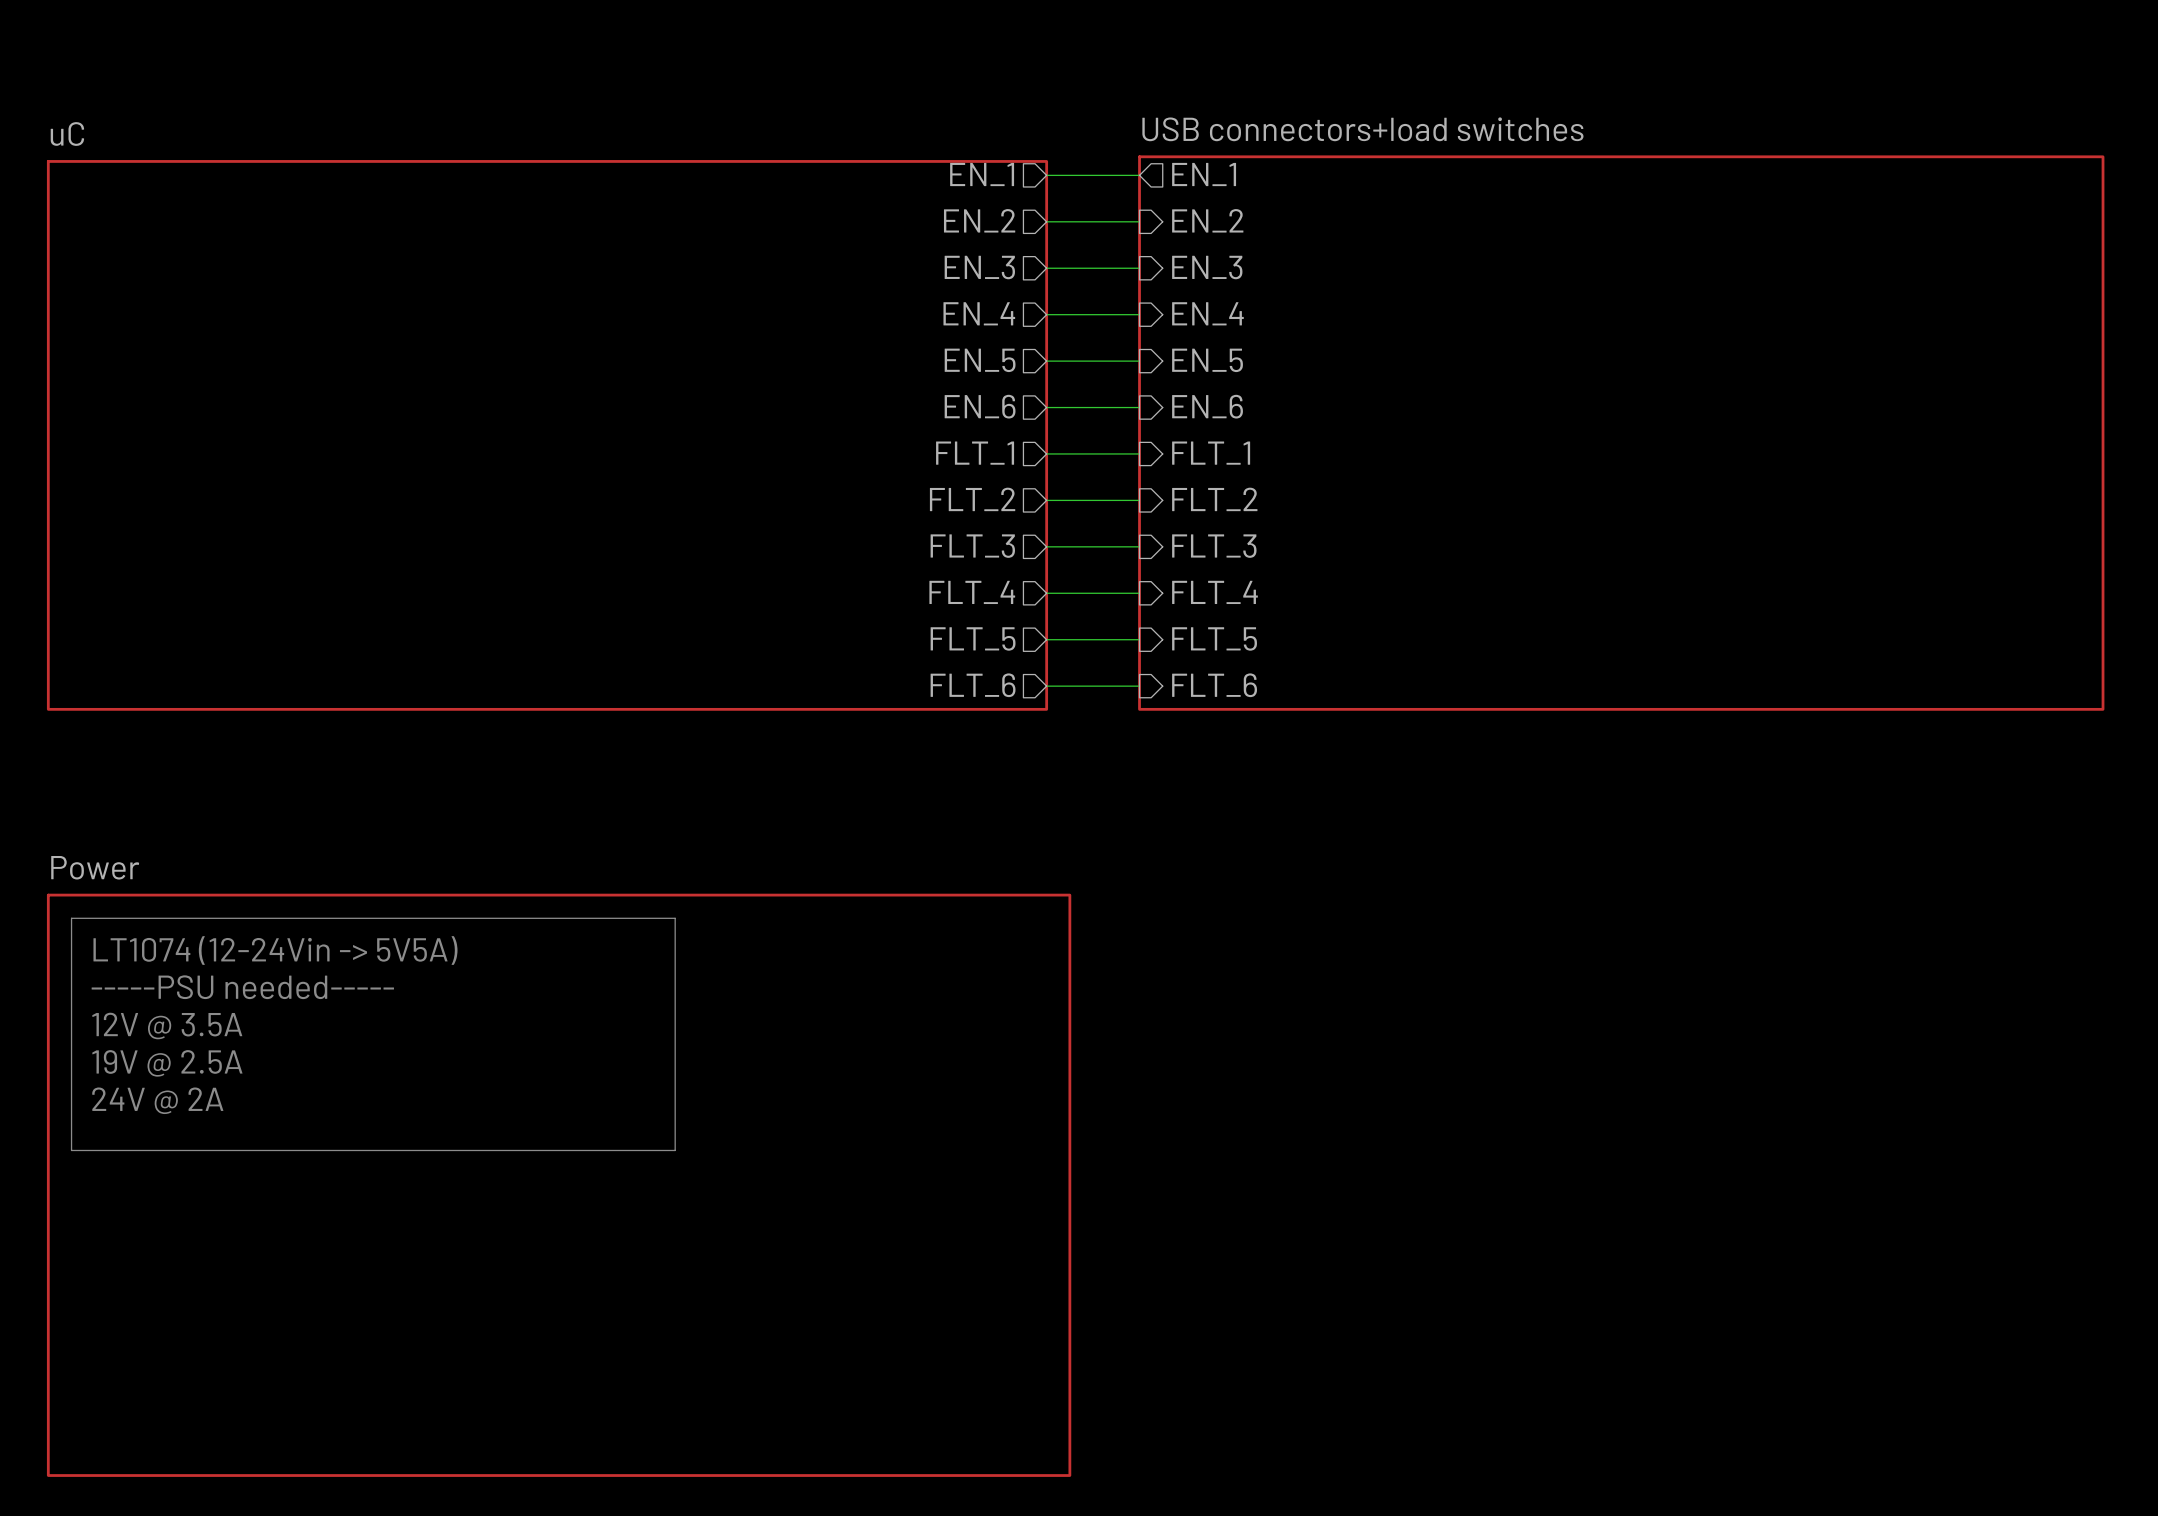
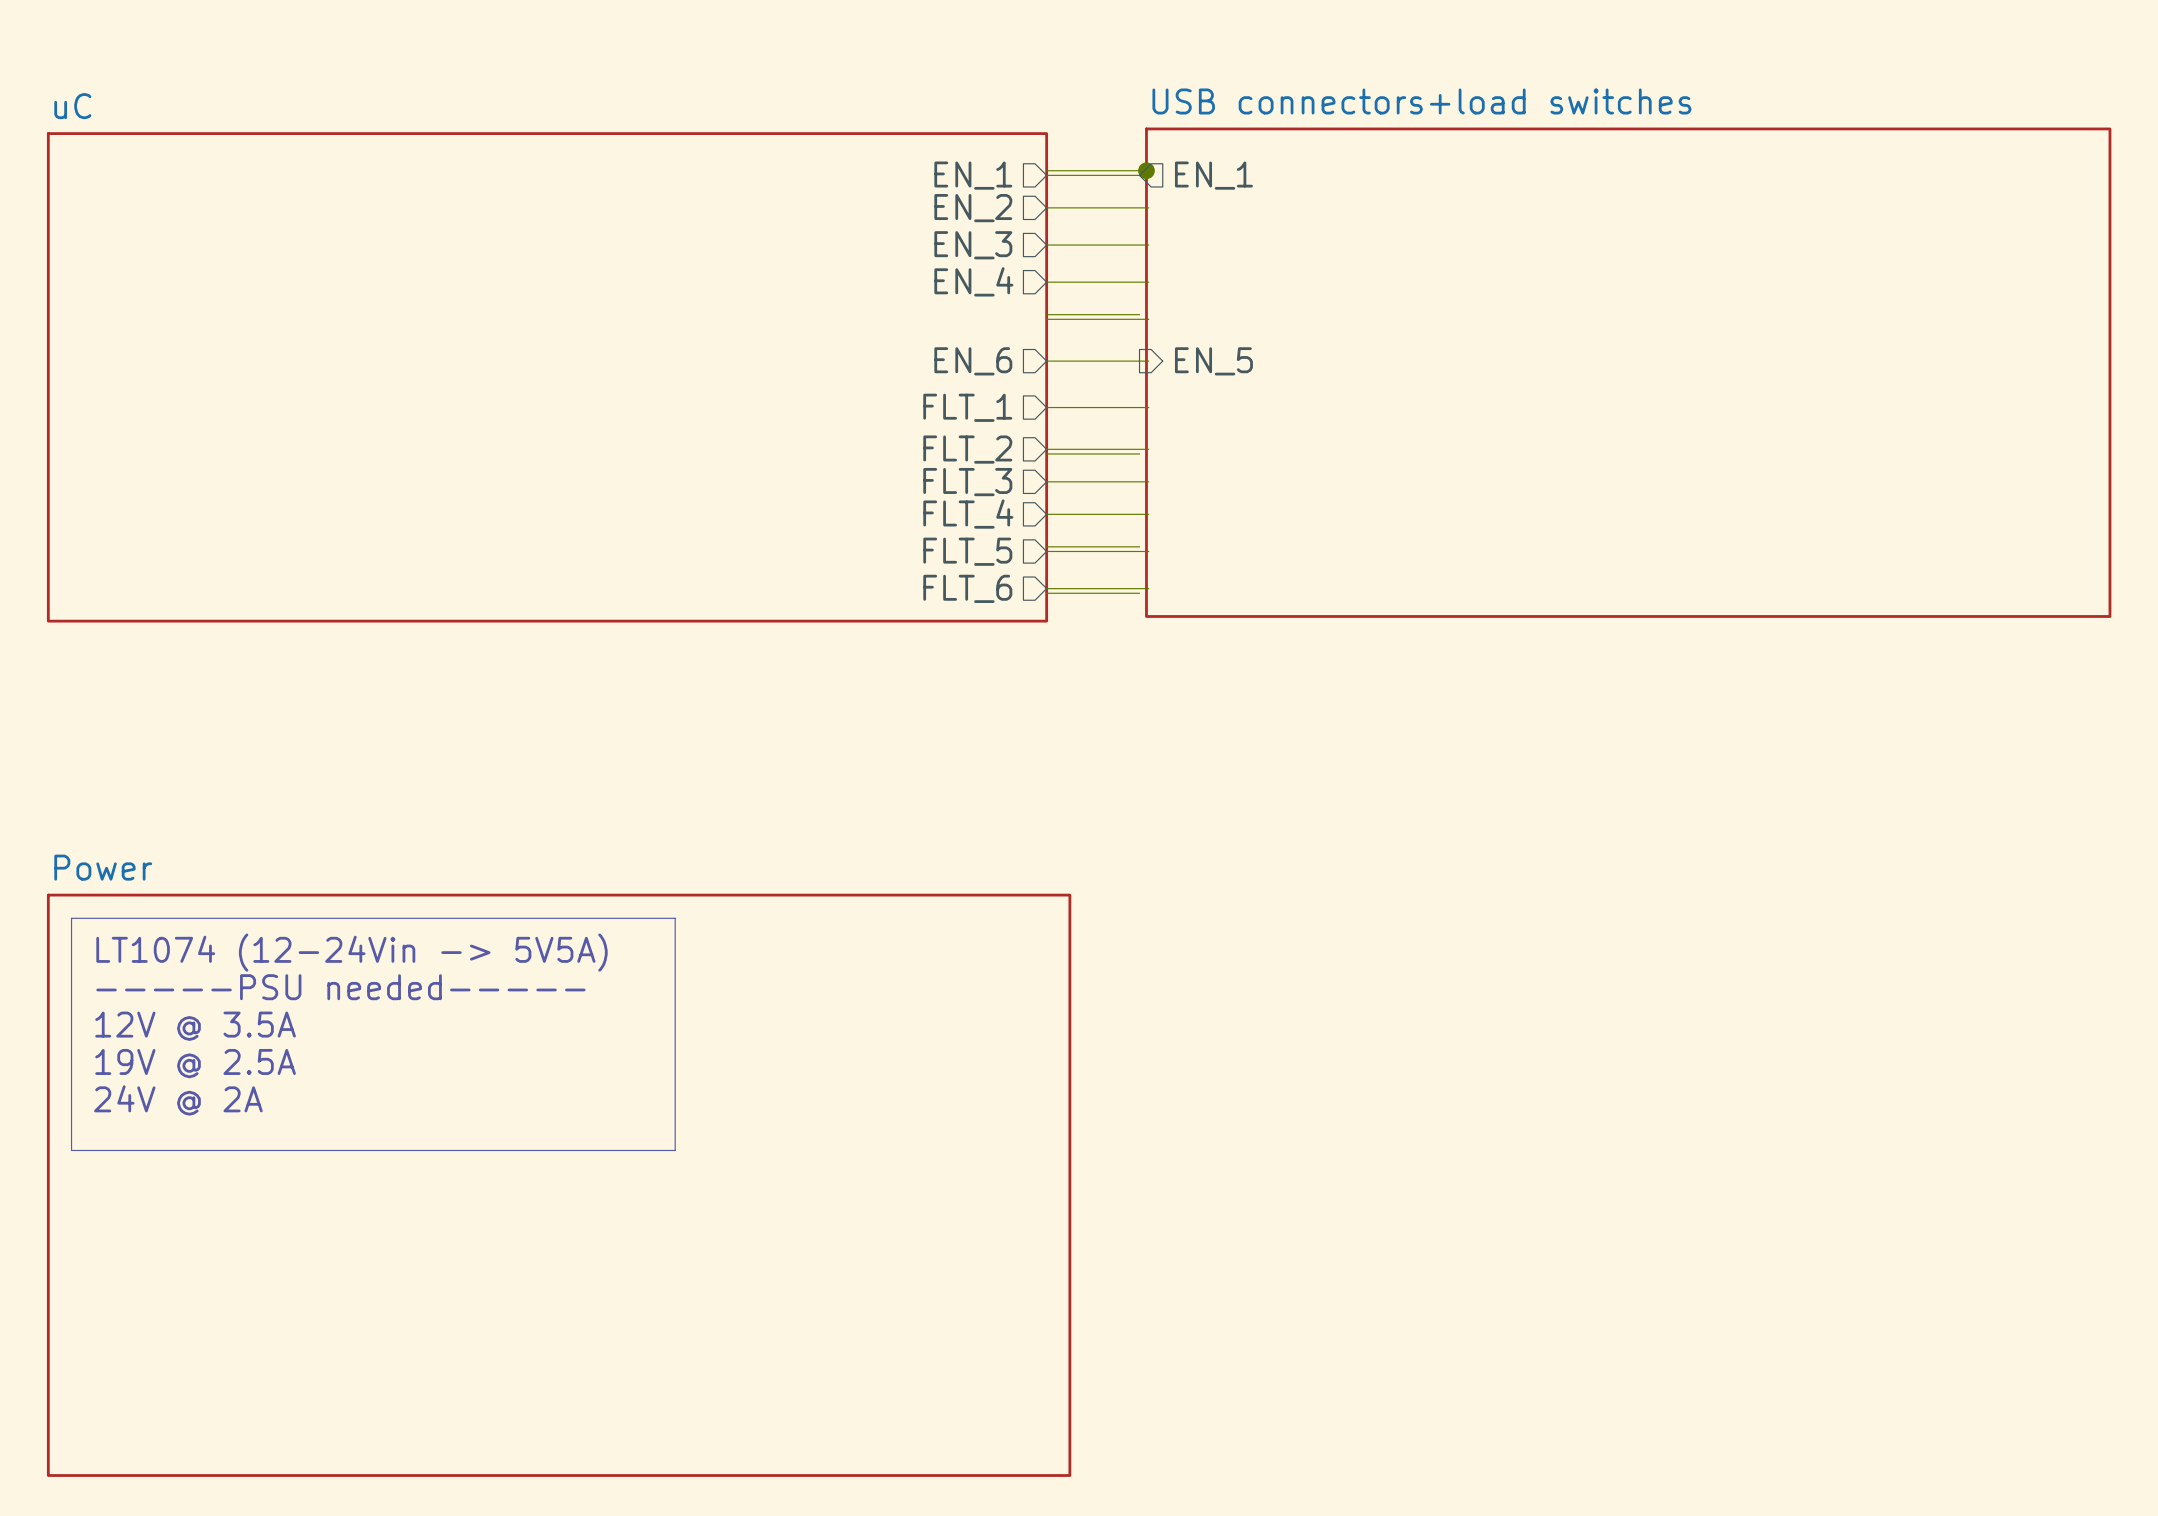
wire: none -> (1046, 170) (1148, 170)
junction: none -> (1146, 170)
wire: none -> (1046, 207) (1148, 207)
sheet pin position: EN_2 (979, 220) -> EN_2 (973, 208)
sheet pin: EN_2 (1207, 220) -> none
wire: (1046, 221) (1139, 221) -> none
wire: none -> (1046, 245) (1148, 245)
sheet pin position: EN_3 (979, 267) -> EN_3 (973, 245)
sheet pin: EN_3 (1207, 267) -> none
wire: (1046, 268) (1139, 268) -> none
wire: none -> (1046, 282) (1148, 282)
sheet pin position: EN_4 (979, 313) -> EN_4 (973, 281)
sheet pin: EN_4 (1207, 313) -> none
wire: none -> (1046, 319) (1148, 319)
sheet pin: EN_5 (980, 360) -> EN_6 (973, 361)
wire: none -> (1139, 361) (1148, 361)
sheet USB connectors+load switches: none -> (1628, 372)
sheet uC: none -> (547, 377)
sheet pin: EN_6 (980, 406) -> FLT_1 (967, 407)
sheet pin: EN_6 (1207, 406) -> none
wire: none -> (1139, 407) (1148, 407)
sheet USB connectors+load switches: (1621, 433) -> none
sheet uC: (547, 435) -> none
wire: none -> (1046, 449) (1148, 449)
sheet pin: FLT_1 (975, 453) -> none
sheet pin: FLT_1 (1211, 453) -> none
wire: none -> (1046, 481) (1148, 481)
sheet pin position: FLT_2 (972, 499) -> FLT_2 (967, 449)
sheet pin: FLT_2 (1214, 499) -> none
wire: (1046, 500) (1139, 500) -> none
wire: none -> (1046, 514) (1148, 514)
sheet pin position: FLT_3 (972, 546) -> FLT_3 (967, 482)
sheet pin: FLT_3 (1214, 546) -> none
sheet pin: none -> FLT_5 (967, 551)
wire: none -> (1046, 551) (1148, 551)
sheet pin: none -> FLT_6 (967, 588)
wire: none -> (1046, 588) (1148, 588)
sheet pin position: FLT_4 (972, 592) -> FLT_4 (968, 514)
sheet pin: FLT_4 (1214, 592) -> none
sheet pin: FLT_5 (973, 638) -> none
sheet pin: FLT_5 (1214, 638) -> none
wire: (1046, 639) (1139, 639) -> none
sheet pin: FLT_6 (973, 685) -> none
sheet pin: FLT_6 (1214, 685) -> none
wire: (1046, 686) (1139, 686) -> none

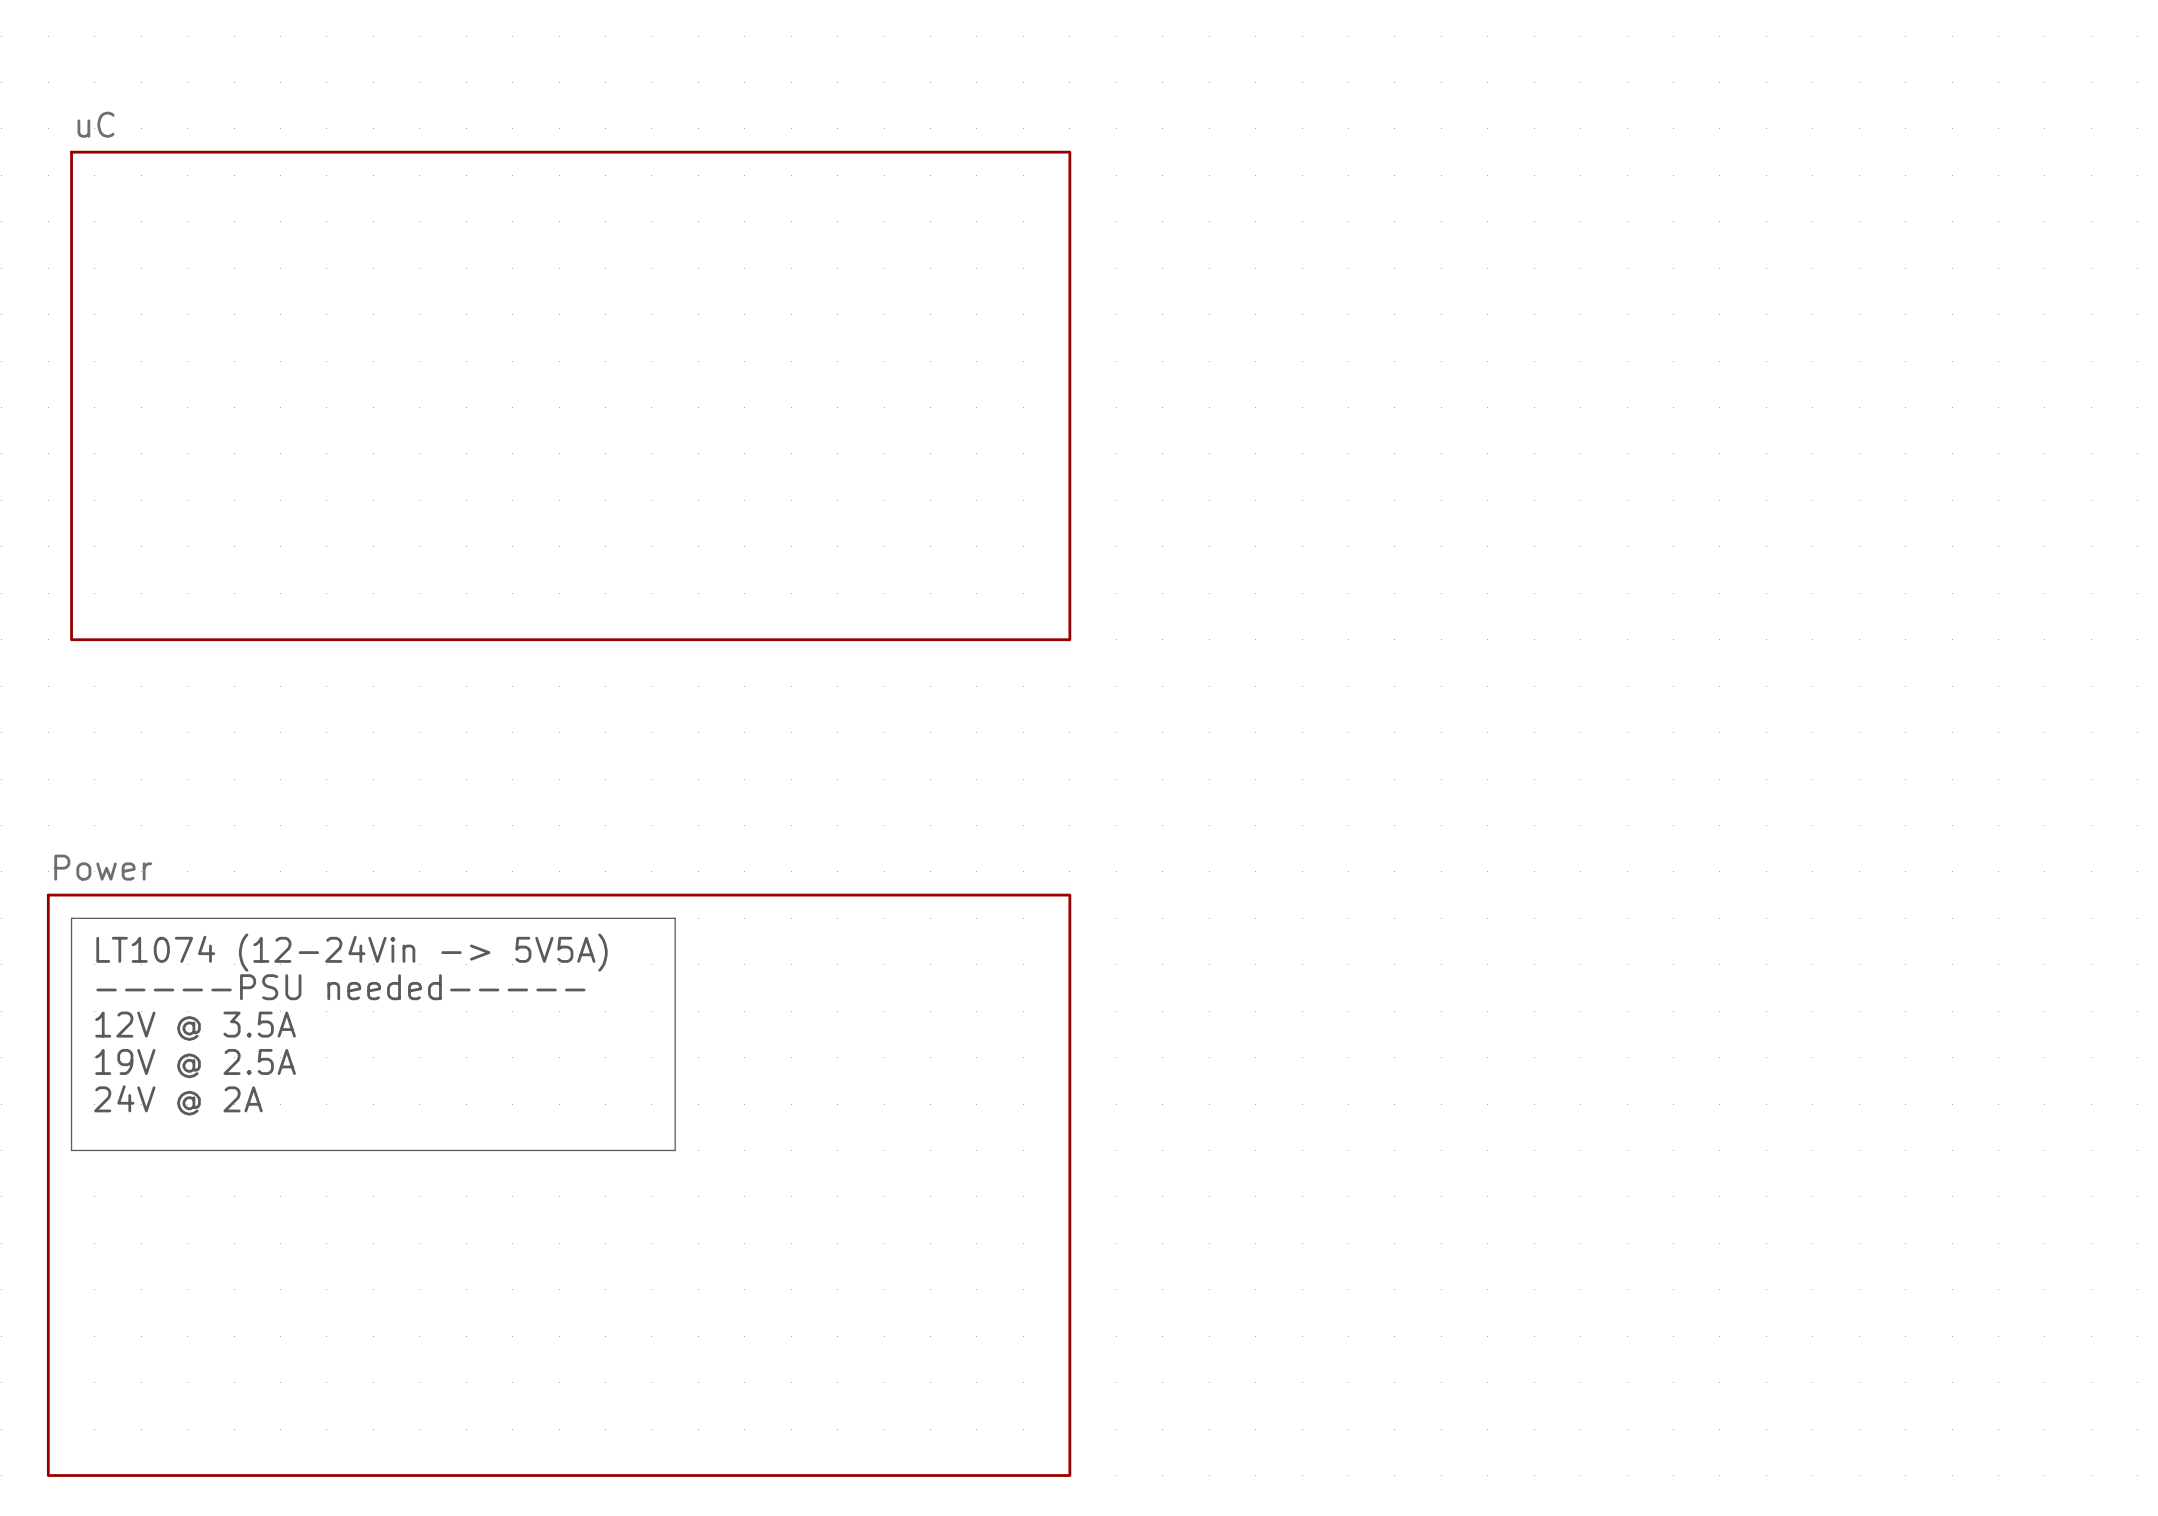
wire: (1046, 170) (1148, 170) -> none
junction: (1146, 170) -> none
sheet pin: EN_1 (973, 175) -> none
wire: (1046, 175) (1139, 175) -> none
sheet pin: EN_1 (1213, 175) -> none
wire: (1046, 207) (1148, 207) -> none
sheet pin: EN_2 (973, 208) -> none
sheet pin: EN_3 (973, 245) -> none
wire: (1046, 245) (1148, 245) -> none
sheet pin: EN_4 (973, 281) -> none
wire: (1046, 282) (1148, 282) -> none
wire: (1046, 314) (1139, 314) -> none
wire: (1046, 319) (1148, 319) -> none
sheet pin: EN_6 (973, 361) -> none
wire: (1046, 361) (1148, 361) -> none
sheet pin: EN_5 (1213, 361) -> none
sheet USB connectors+load switches: (1628, 372) -> none
sheet uC position: (547, 377) -> (570, 395)
sheet pin: FLT_1 (967, 407) -> none
wire: (1046, 407) (1148, 407) -> none
sheet pin: FLT_2 (967, 449) -> none
wire: (1046, 449) (1148, 449) -> none
wire: (1046, 453) (1139, 453) -> none
wire: (1046, 481) (1148, 481) -> none
sheet pin: FLT_3 (967, 482) -> none
sheet pin: FLT_4 (968, 514) -> none
wire: (1046, 514) (1148, 514) -> none
wire: (1046, 546) (1139, 546) -> none
sheet pin: FLT_5 (967, 551) -> none
wire: (1046, 551) (1148, 551) -> none
sheet pin: FLT_6 (967, 588) -> none
wire: (1046, 588) (1148, 588) -> none
wire: (1046, 593) (1139, 593) -> none

